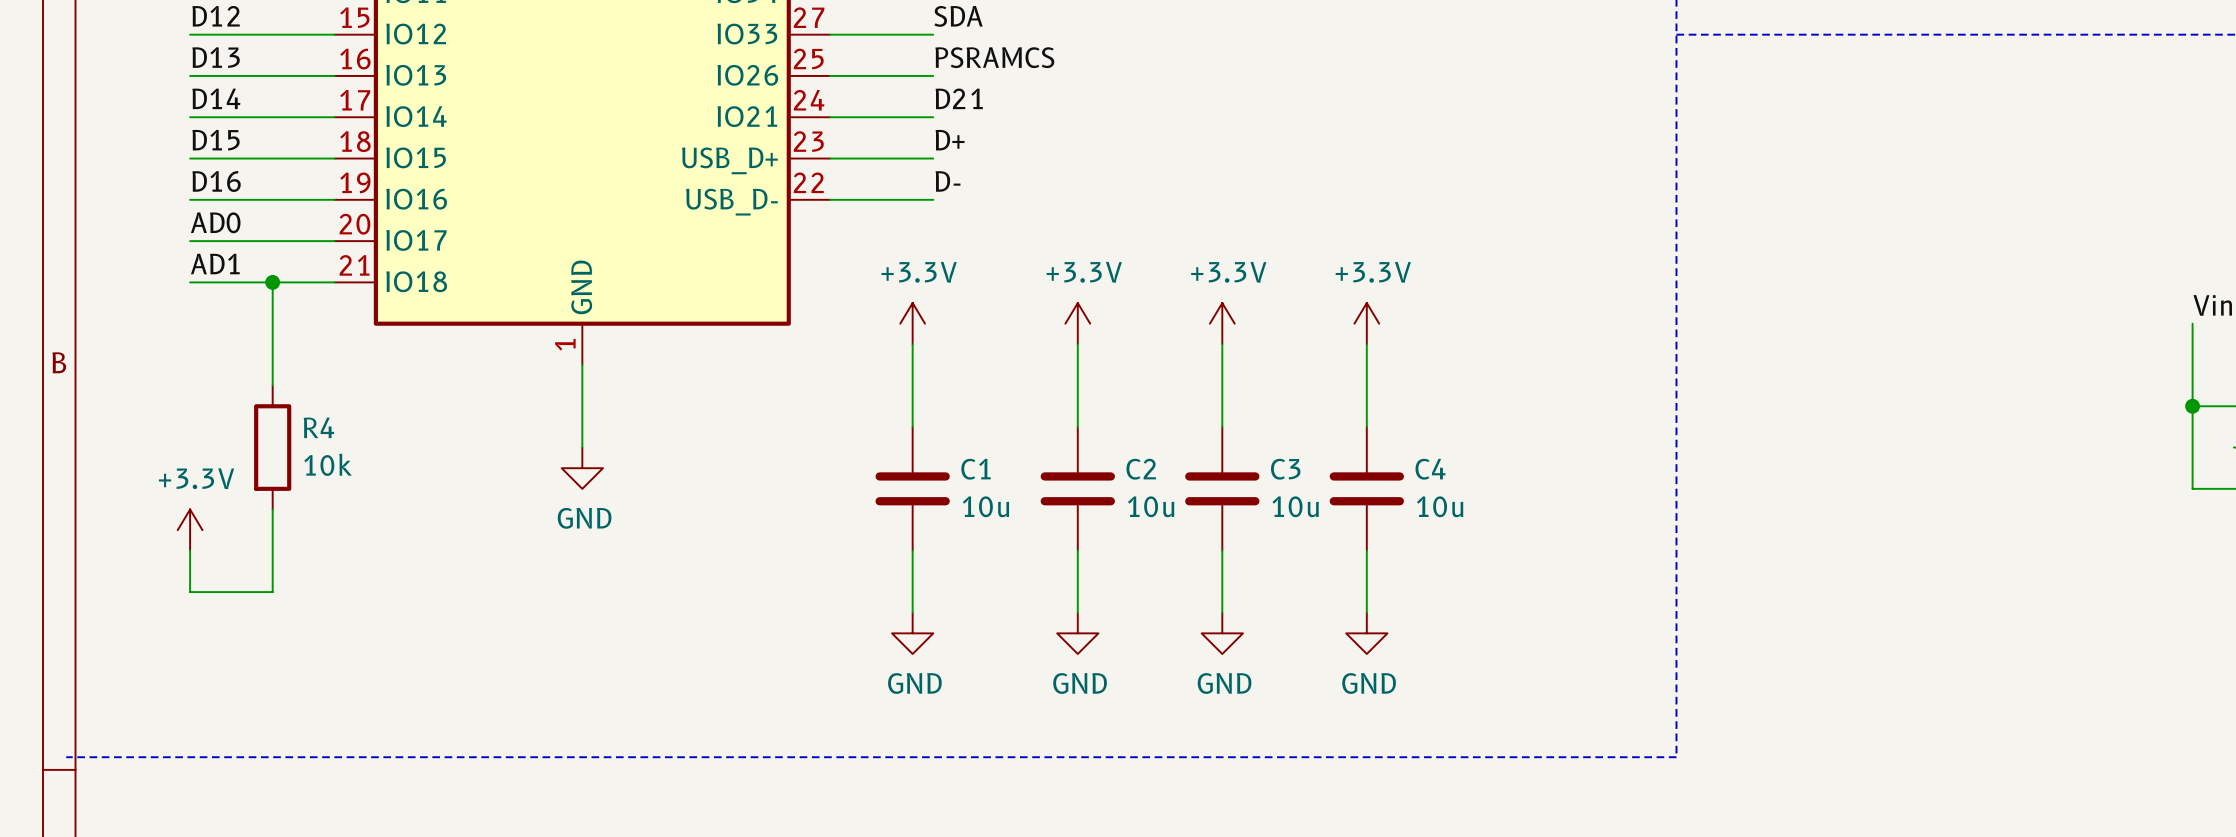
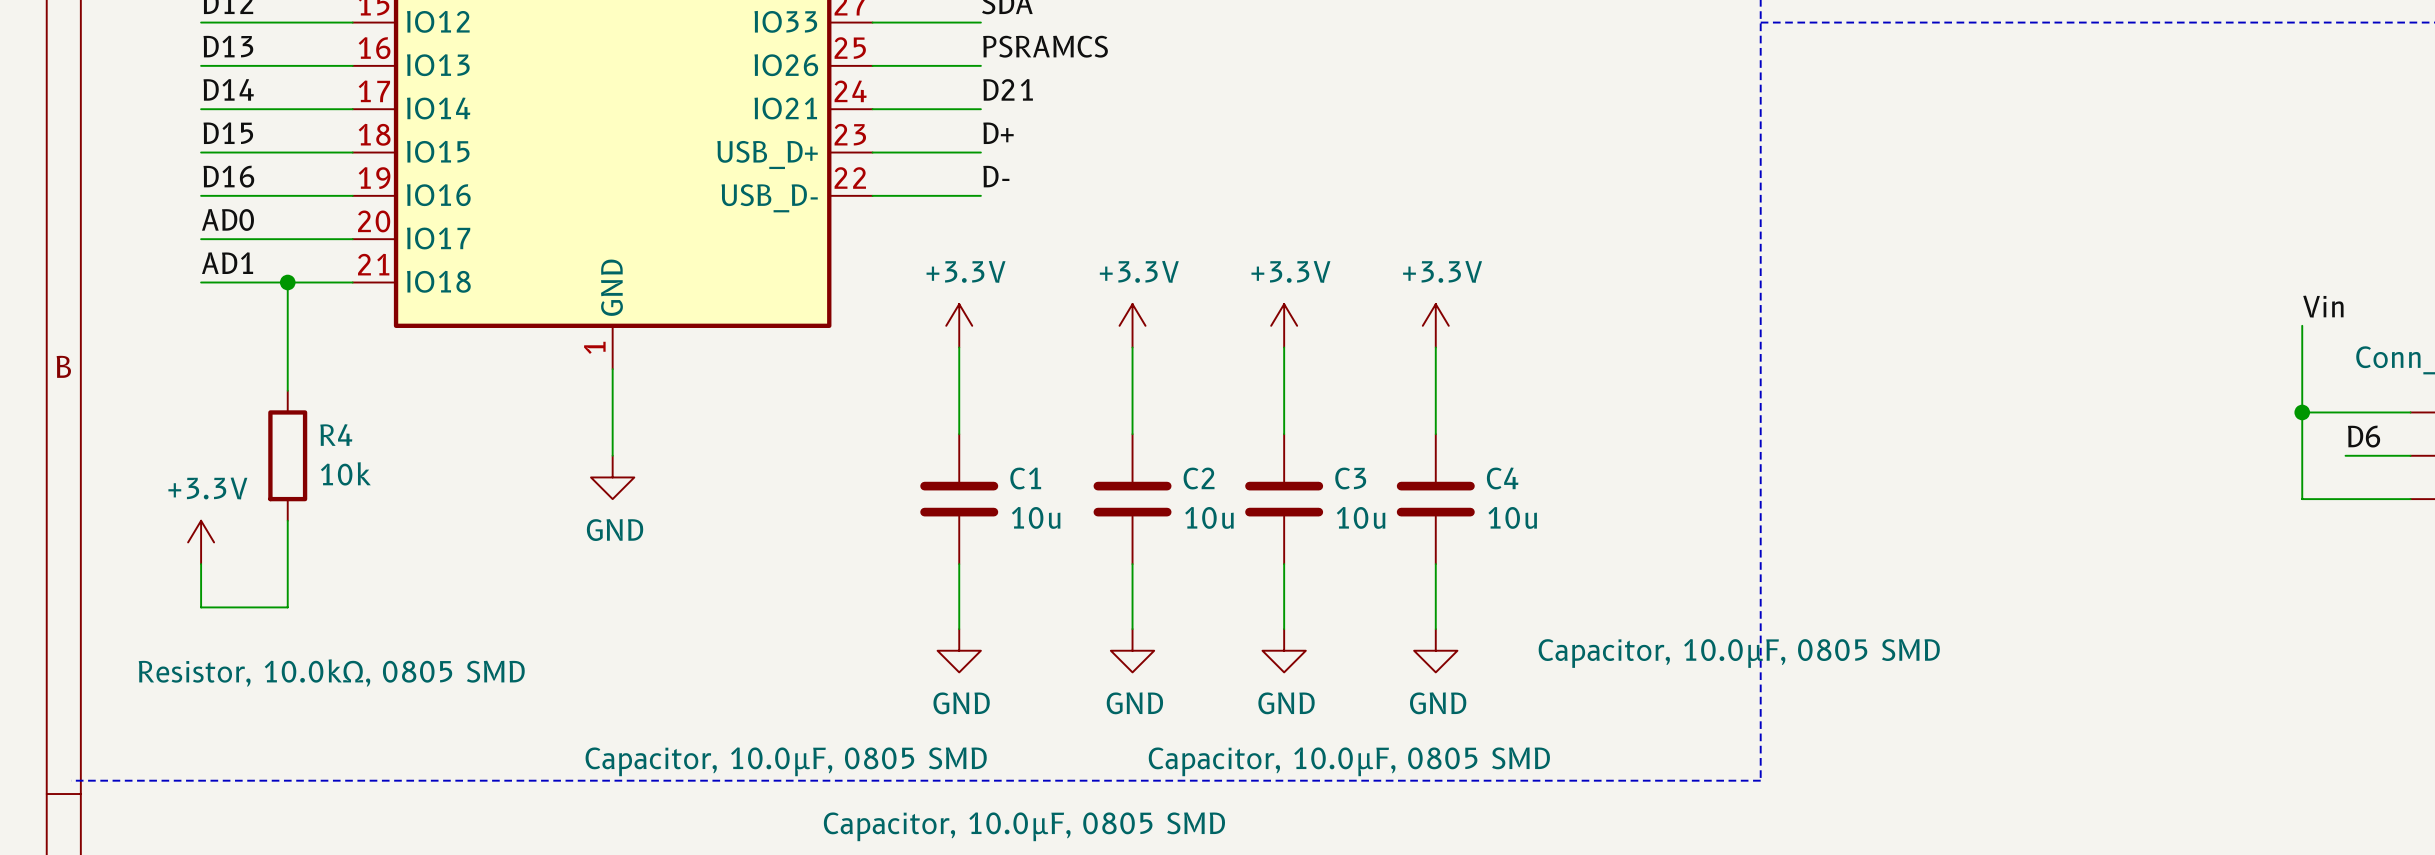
C4 text: none -> Capacitor, 10.0µF, 0805 SMD (1739, 653)
R4 text: none -> Resistor, 10.0kΩ, 0805 SMD (331, 673)
C1 text: none -> Capacitor, 10.0µF, 0805 SMD (786, 761)
C3 text: none -> Capacitor, 10.0µF, 0805 SMD (1349, 761)
C2 text: none -> Capacitor, 10.0µF, 0805 SMD (1024, 826)

